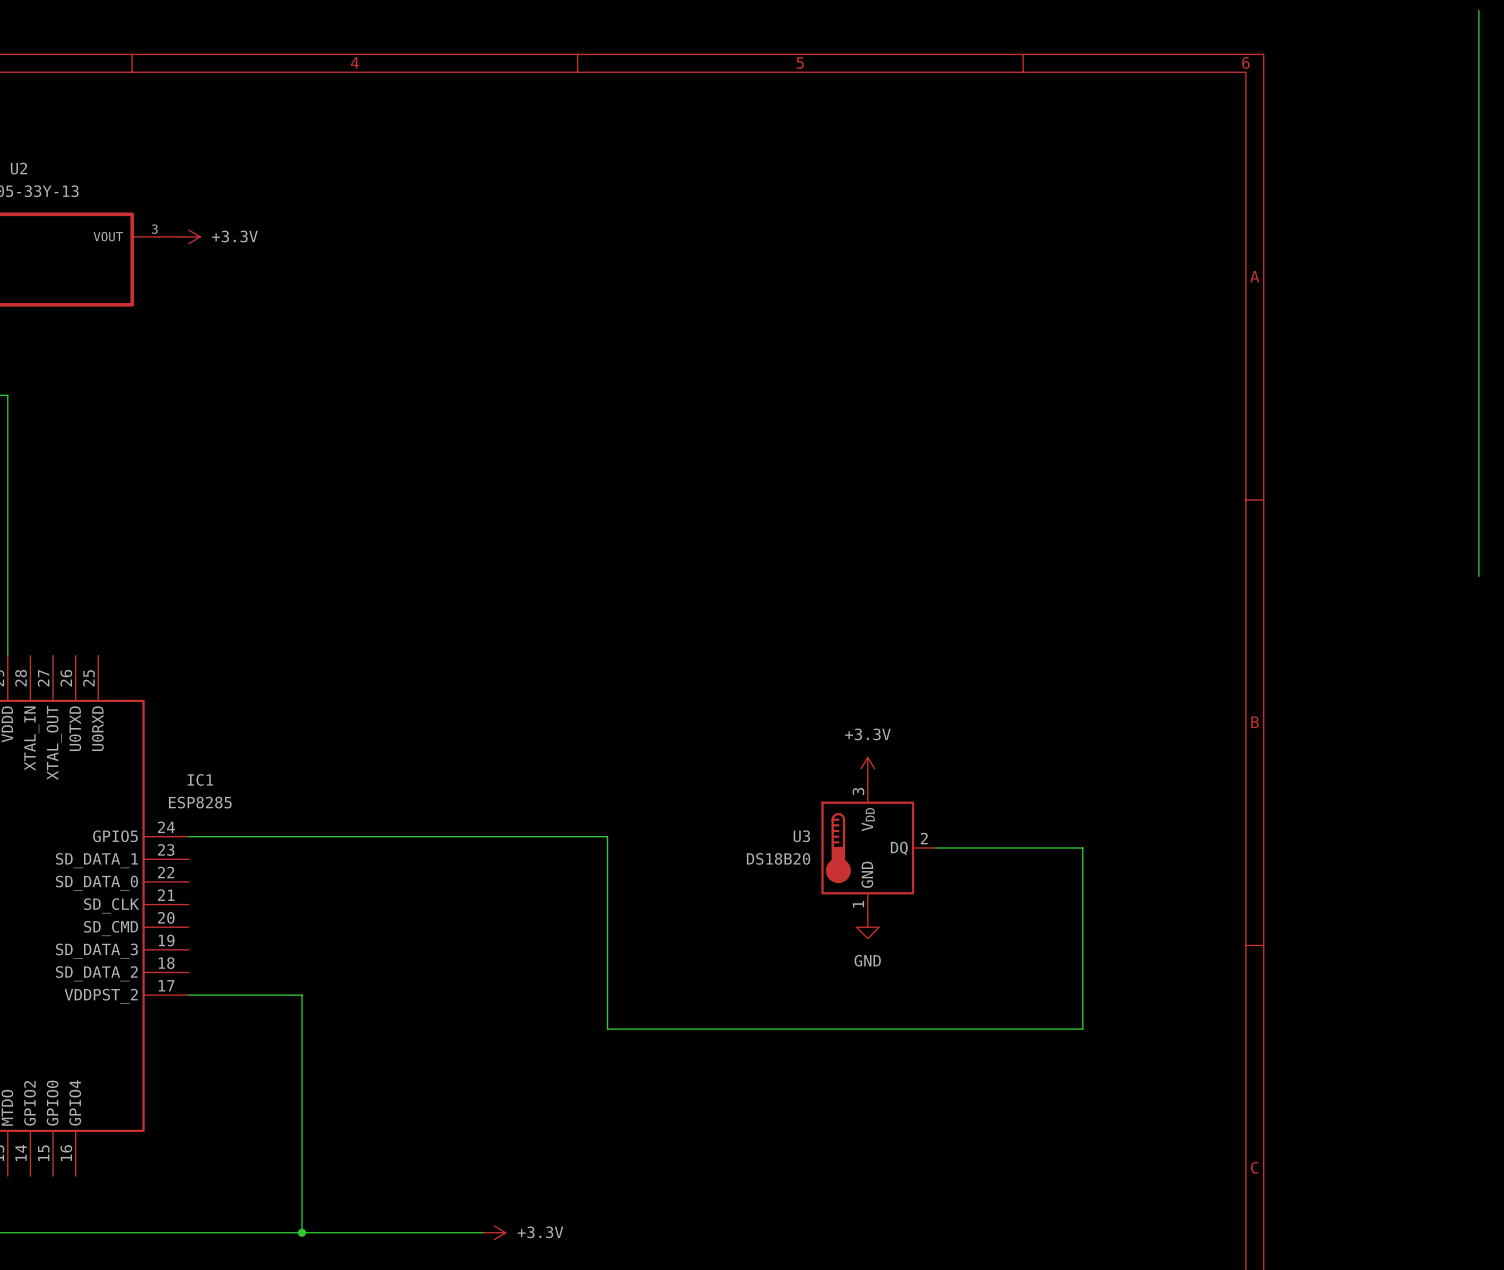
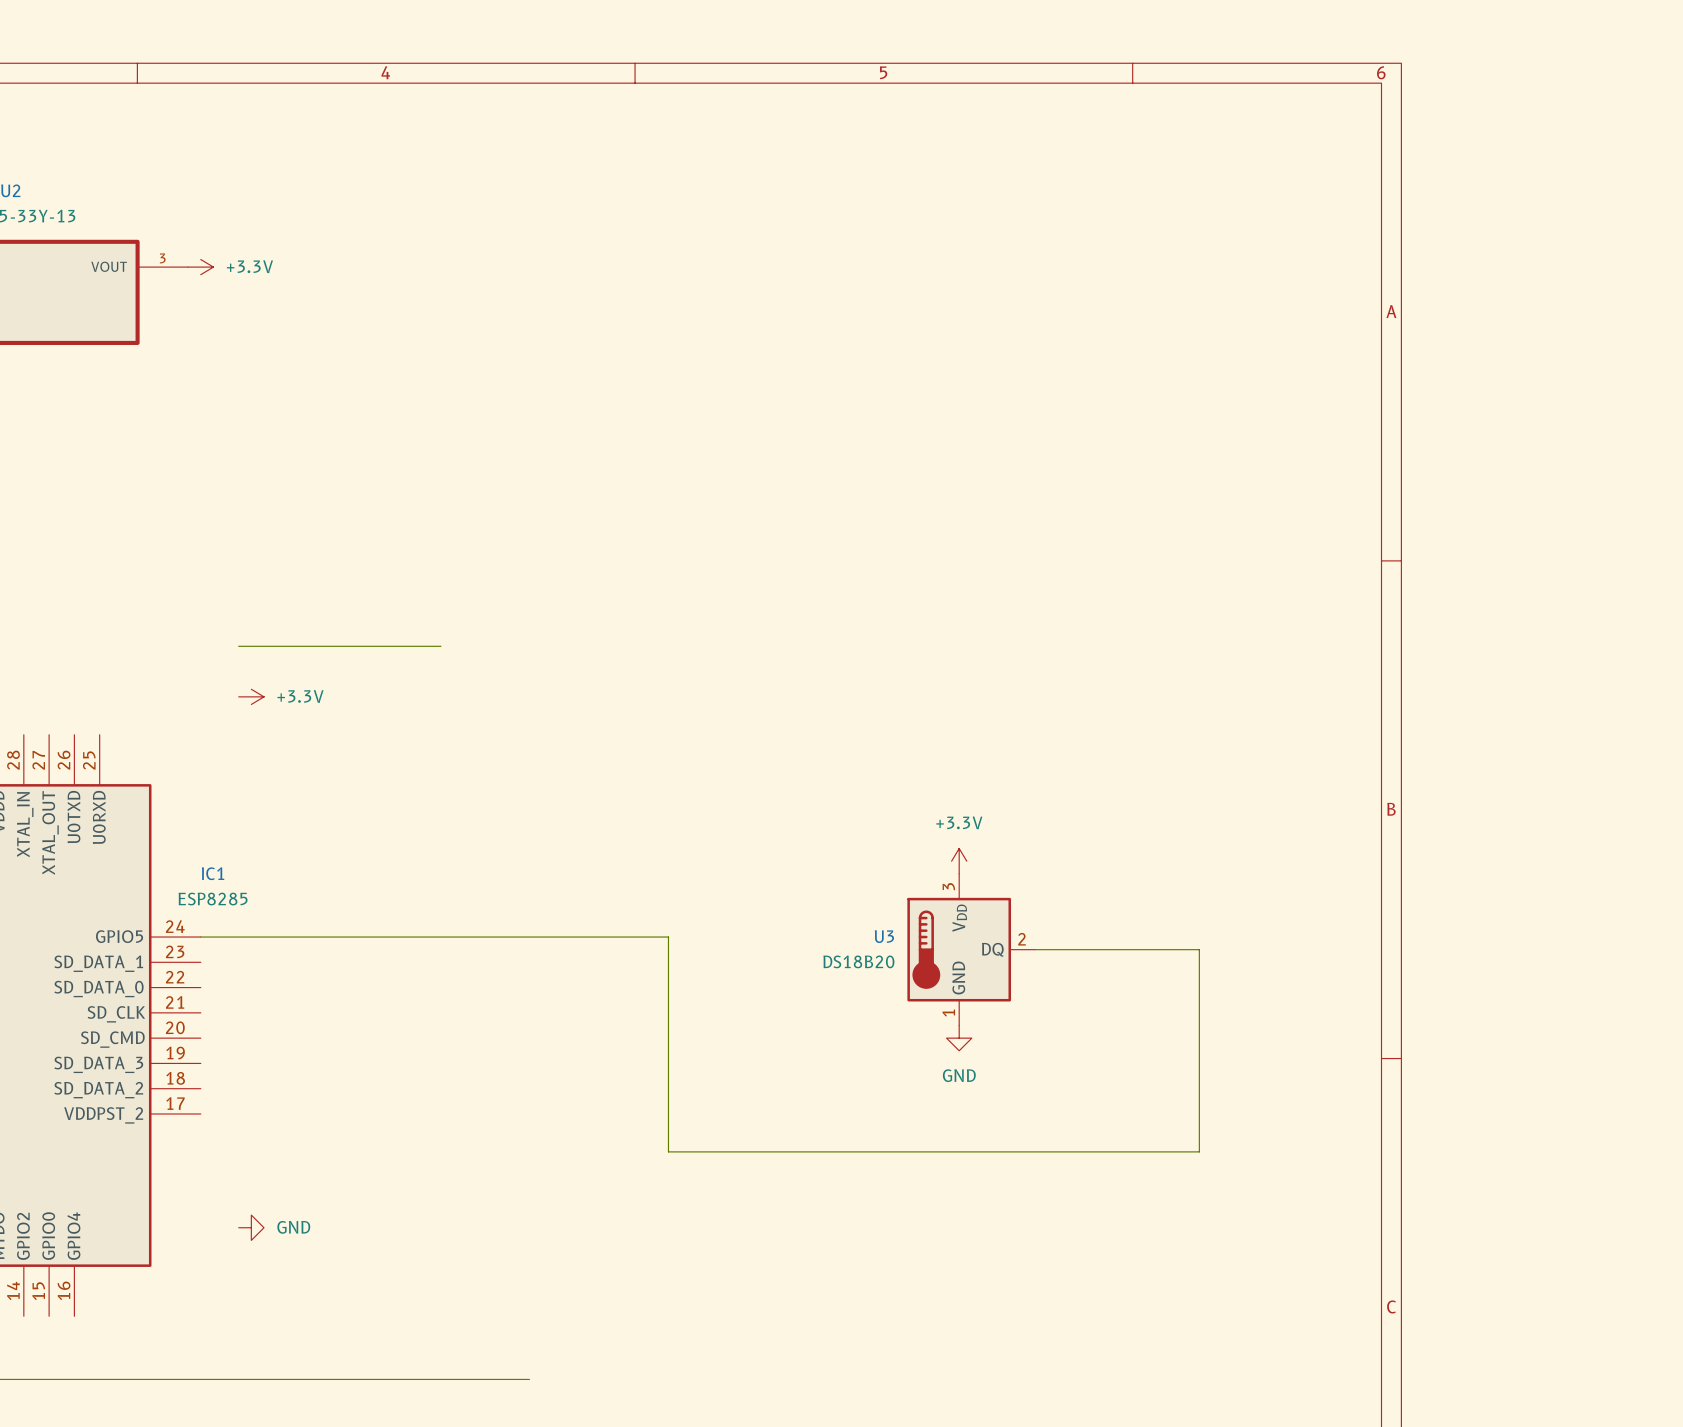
wire: (1478, 10) (1478, 576) -> none
wire: none -> (238, 646) (440, 646)
power symbol: none -> +3.3V (251, 696)
wire: (188, 995) (301, 995) (301, 1232) -> none
power symbol: none -> GND (251, 1227)
junction: (301, 1232) -> none
power symbol: +3.3V (494, 1232) -> none

